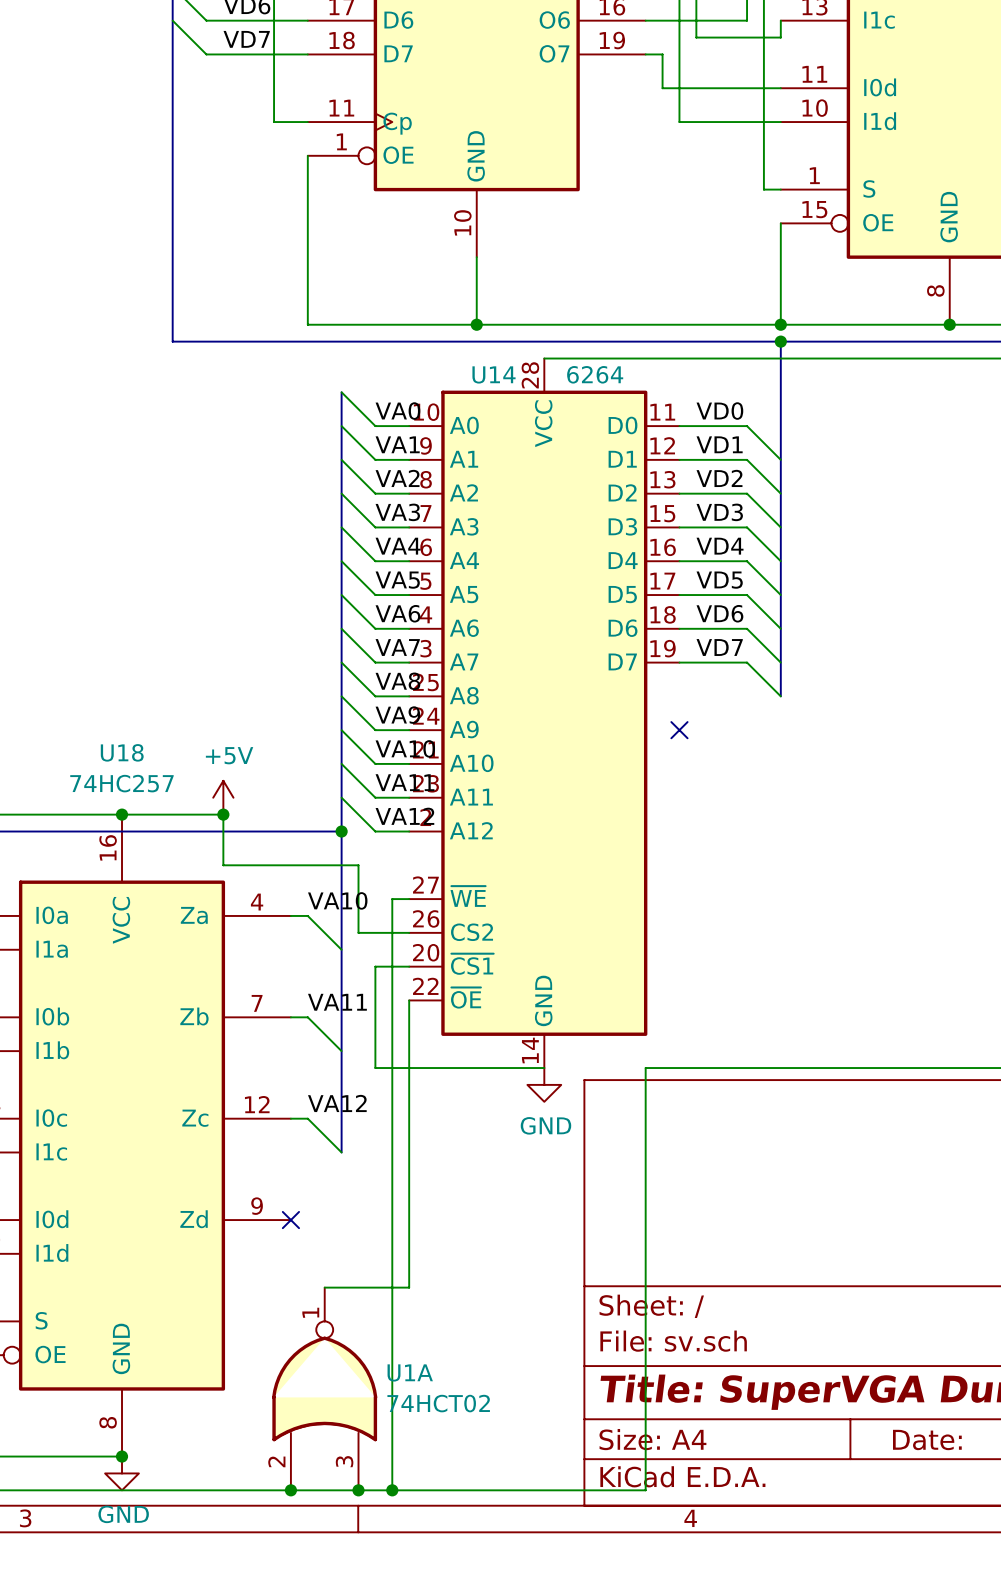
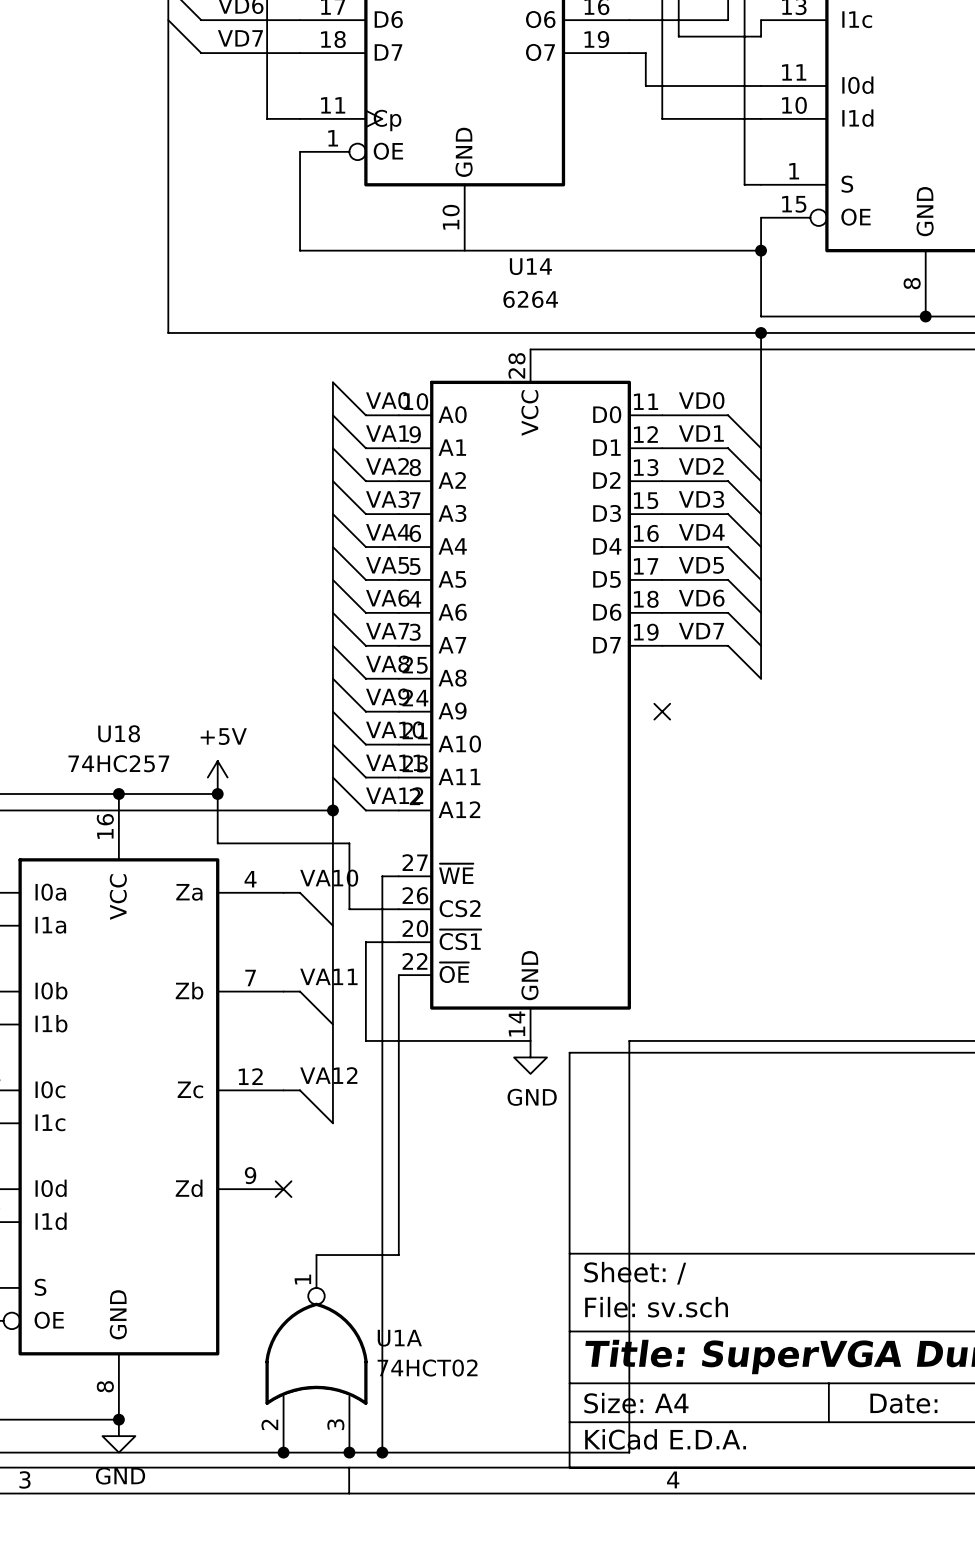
wire: (307, 257) (307, 324) (780, 324) -> (300, 250) (761, 250)
wire: (476, 257) (476, 324) -> none
junction: (476, 324) -> none
junction position: (780, 324) -> (761, 250)
U14 name position: U14 (494, 374) -> U14 (530, 266)
U14 value position: 6264 (595, 374) -> 6264 (530, 299)

